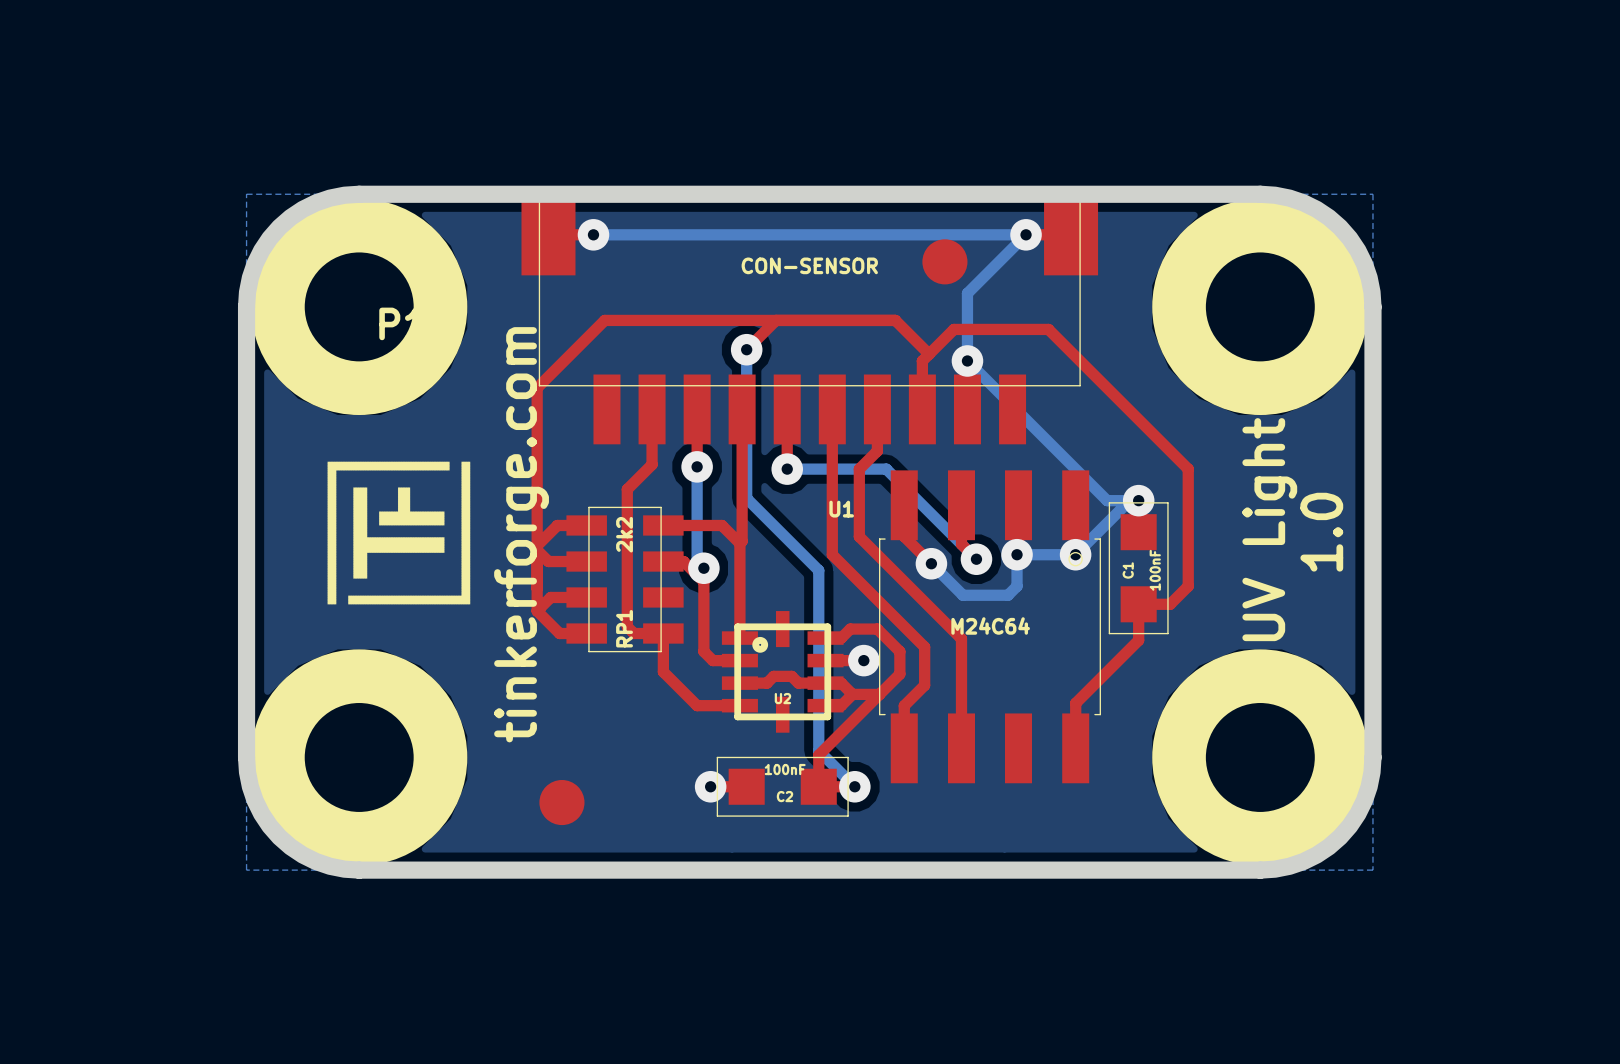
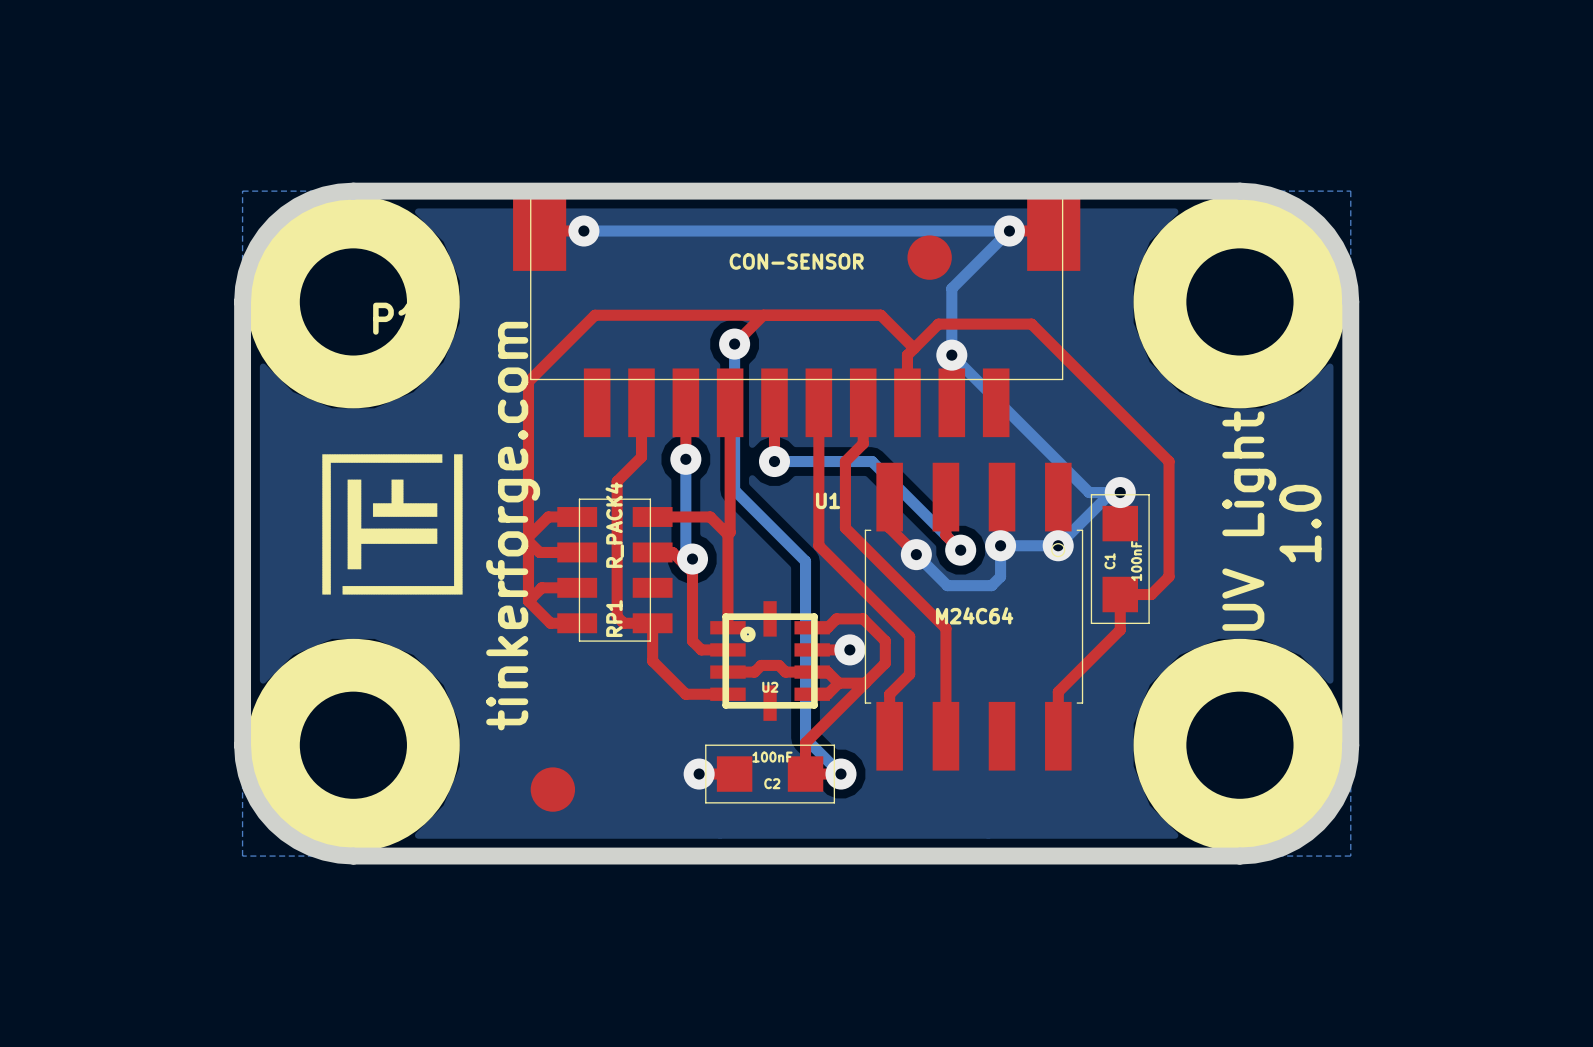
RP1 value: 2k2 (624, 534) -> R_PACK4 (614, 525)

